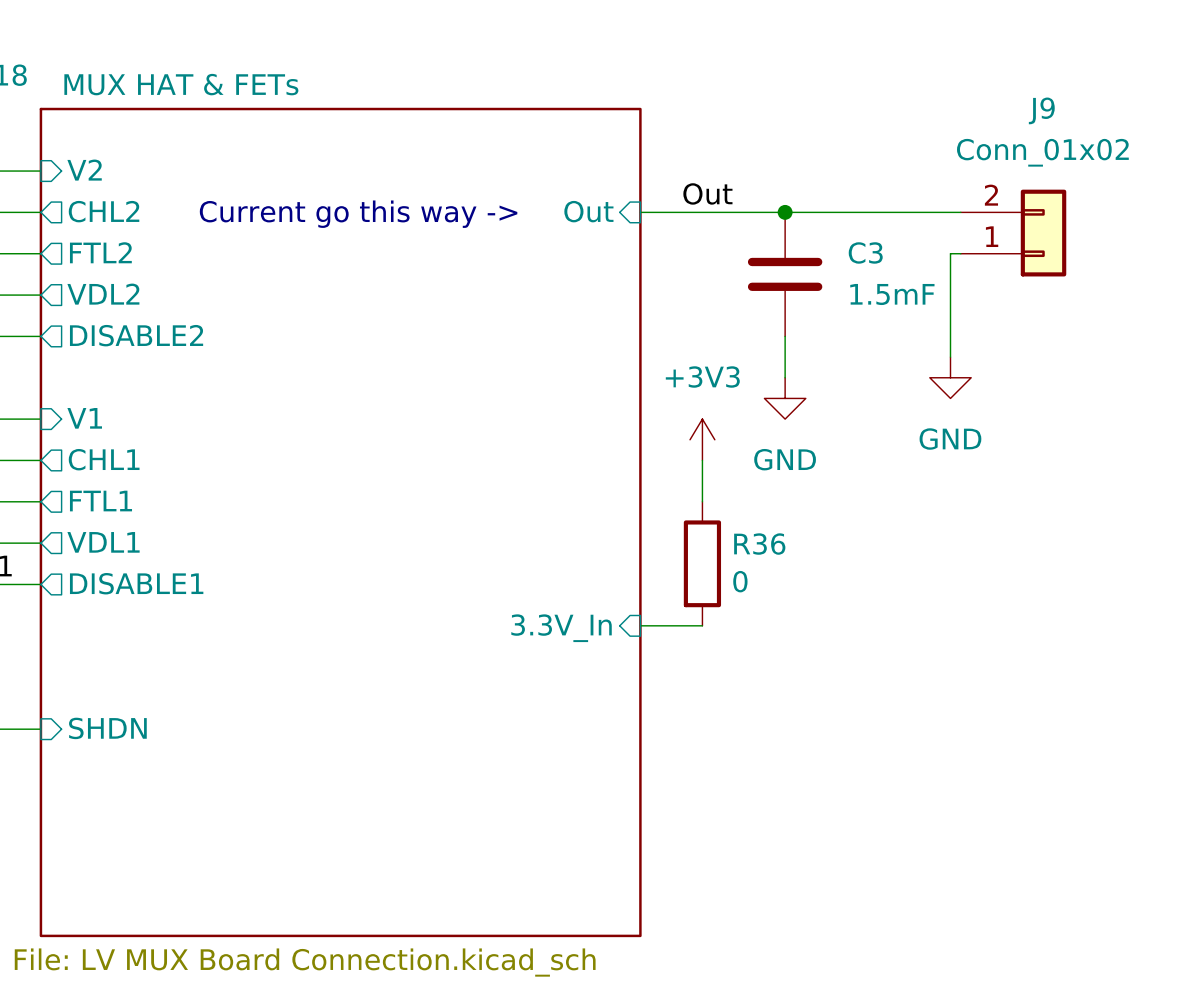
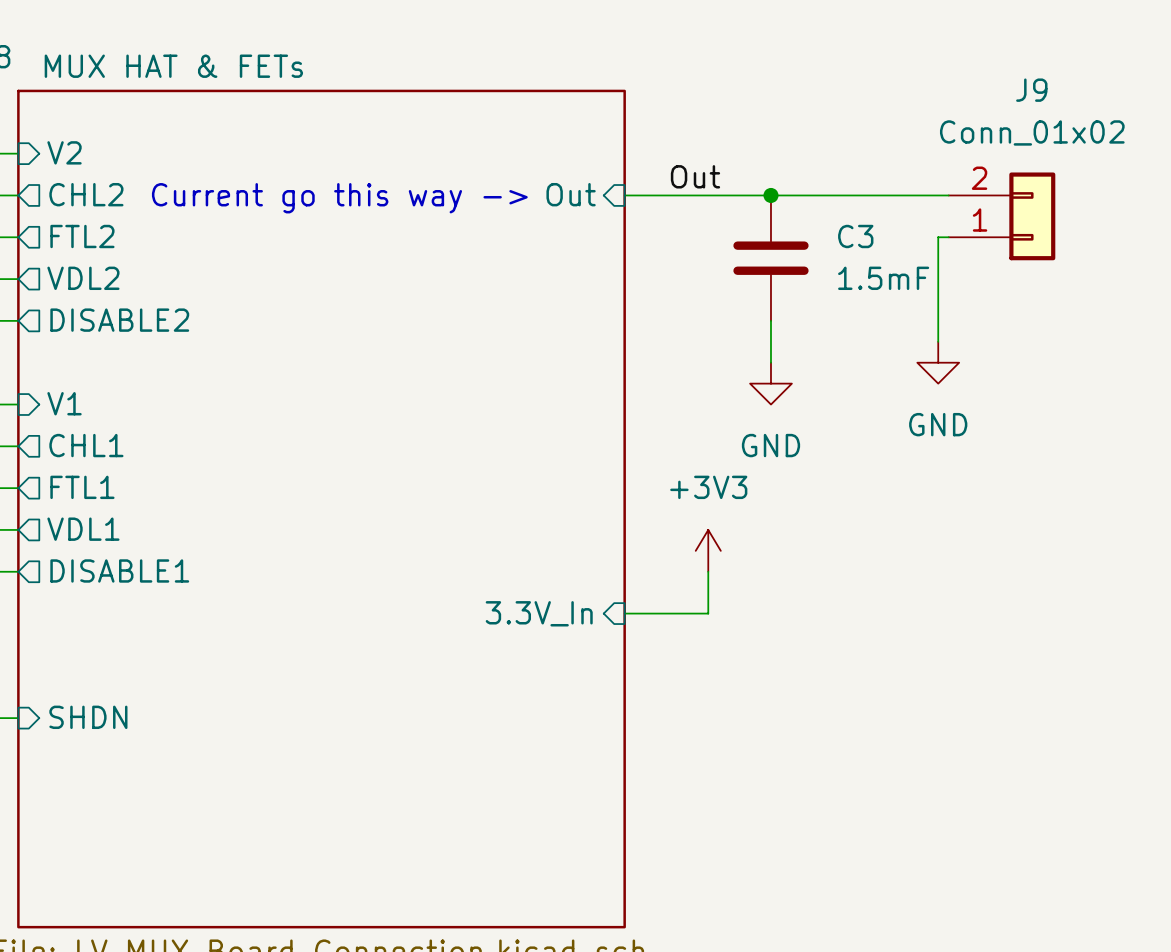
power symbol position: +3V3 (702, 439) -> +3V3 (708, 550)
wire: (702, 460) (702, 501) -> none
R36: 0 (702, 563) -> none
wire: none -> (708, 571) (708, 613) (687, 613)

